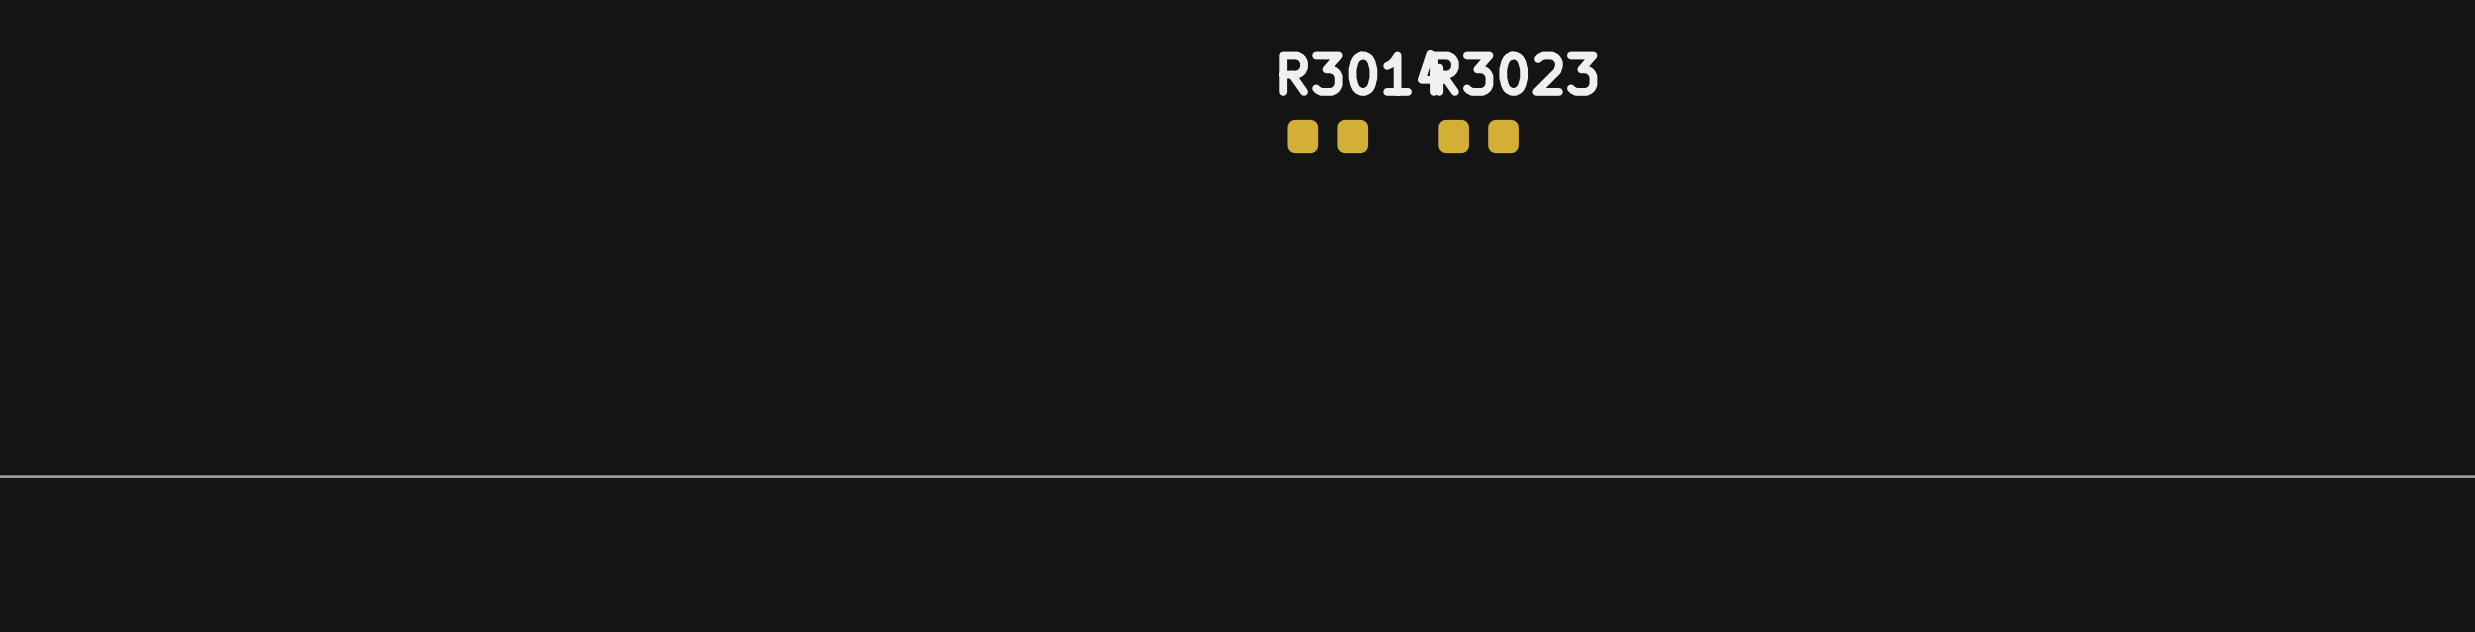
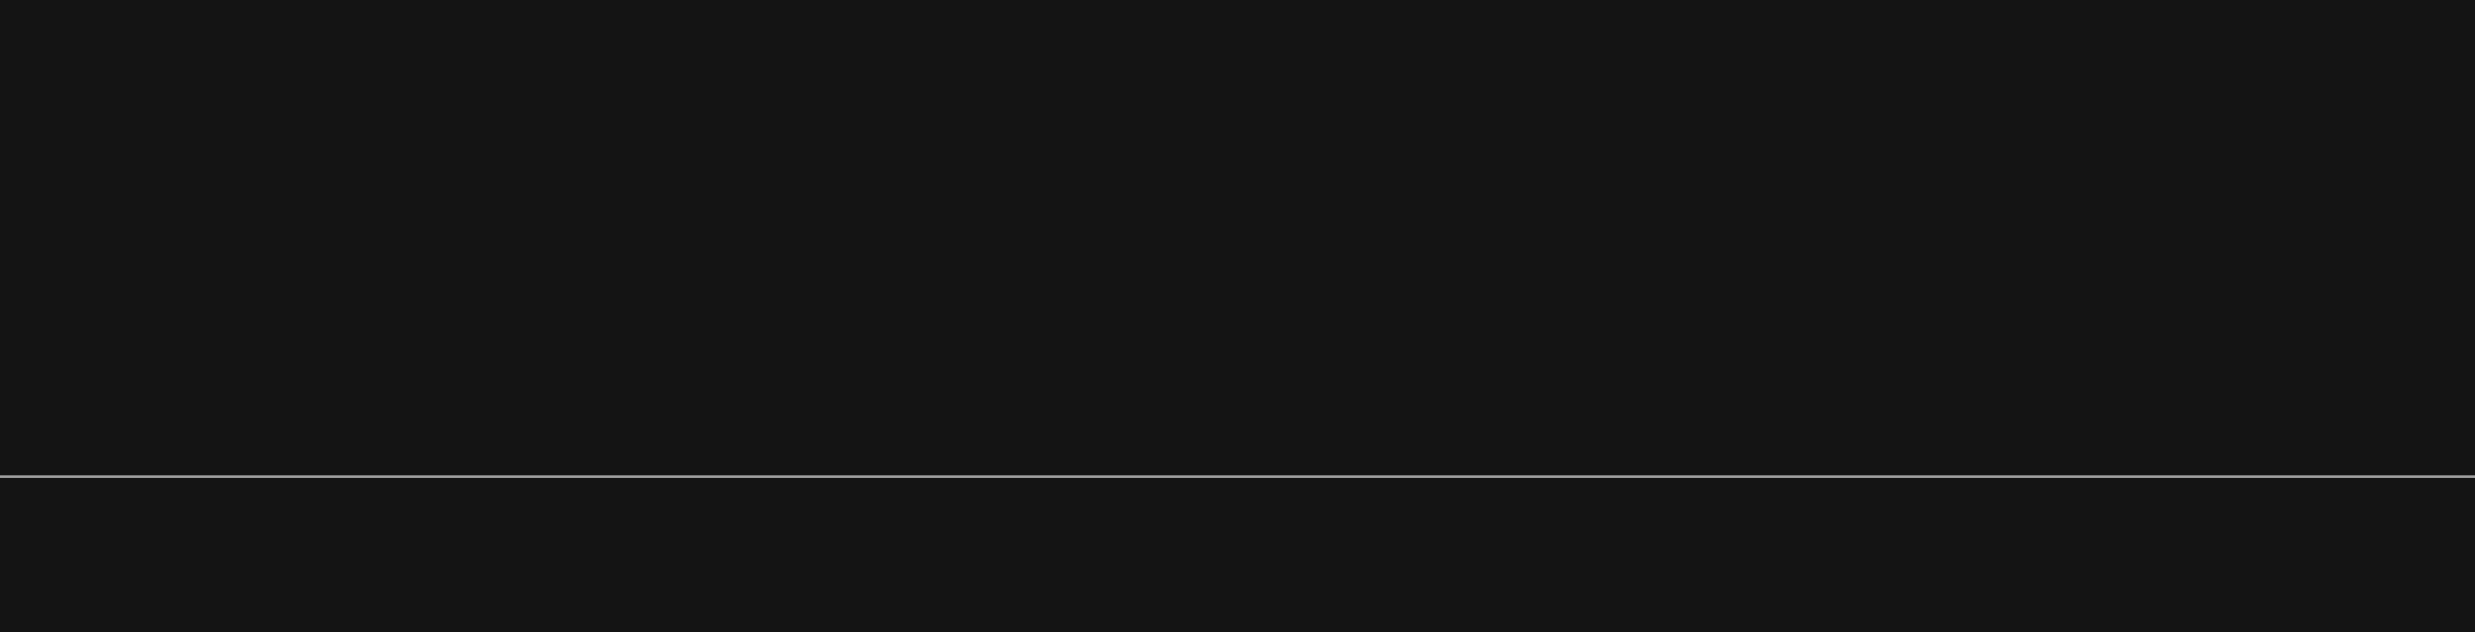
R3014: (1327, 136) -> none
R3023: (1478, 136) -> none

